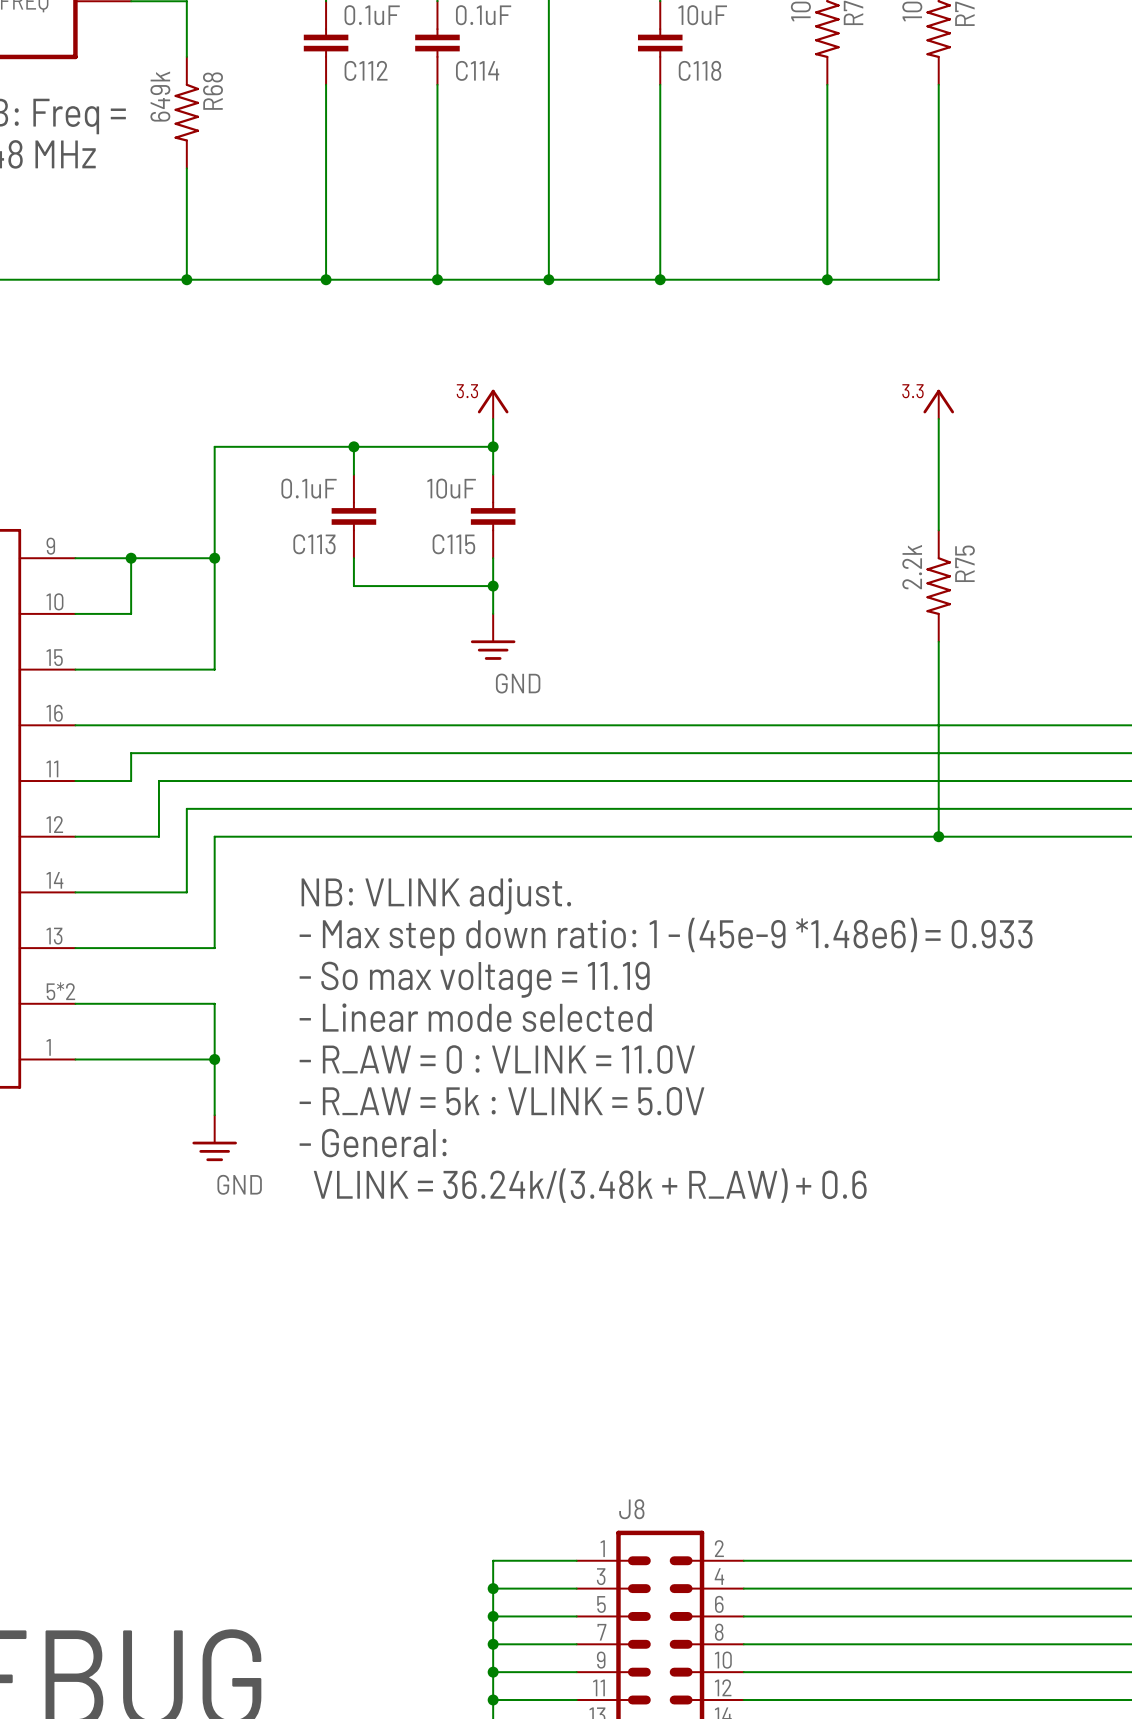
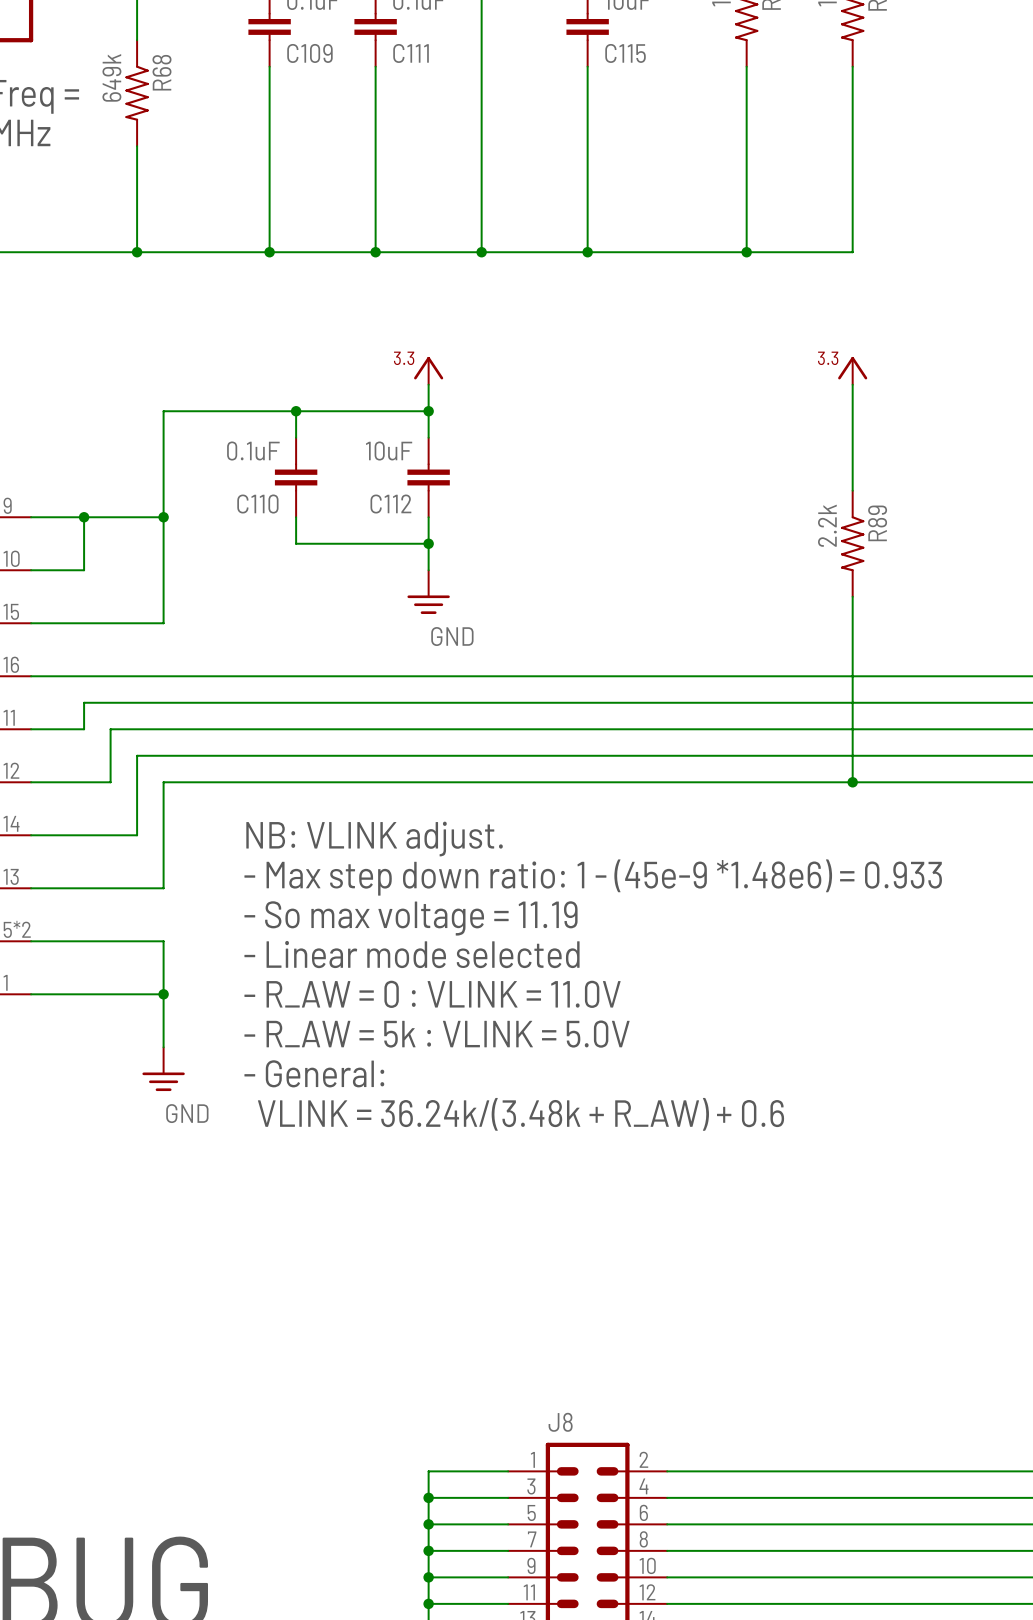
C112 name: C112 (366, 70) -> C109 (309, 53)
C114 name: C114 (477, 70) -> C111 (411, 53)
C118 name: C118 (700, 70) -> C115 (625, 53)
C113 name: C113 (314, 544) -> C110 (257, 504)
C115 name: C115 (453, 544) -> C112 (390, 504)
R75 name: R75 (965, 563) -> R89 (877, 523)

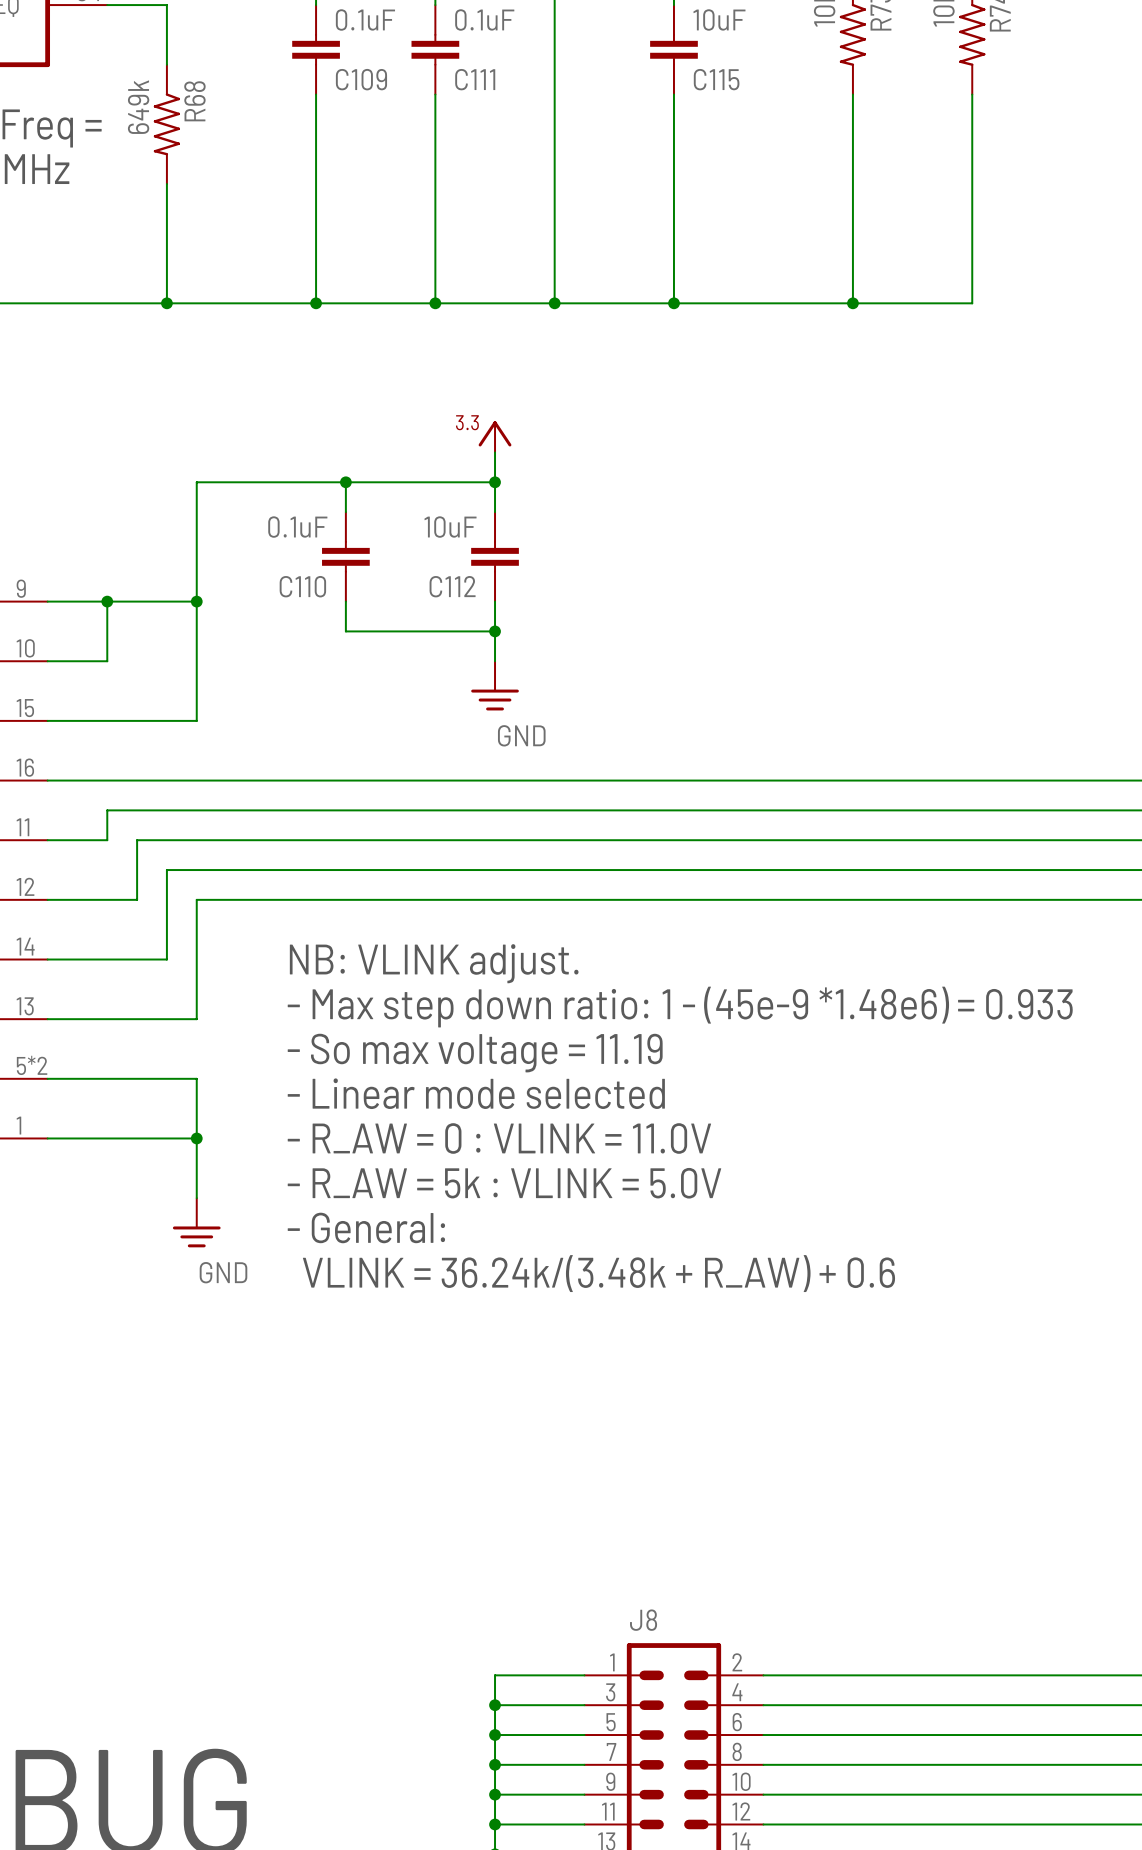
power symbol: (852, 370) -> none
wire: (852, 384) (852, 490) -> none
R89: 2.2k (852, 543) -> none
wire: (852, 596) (852, 782) -> none
junction: (852, 782) -> none

